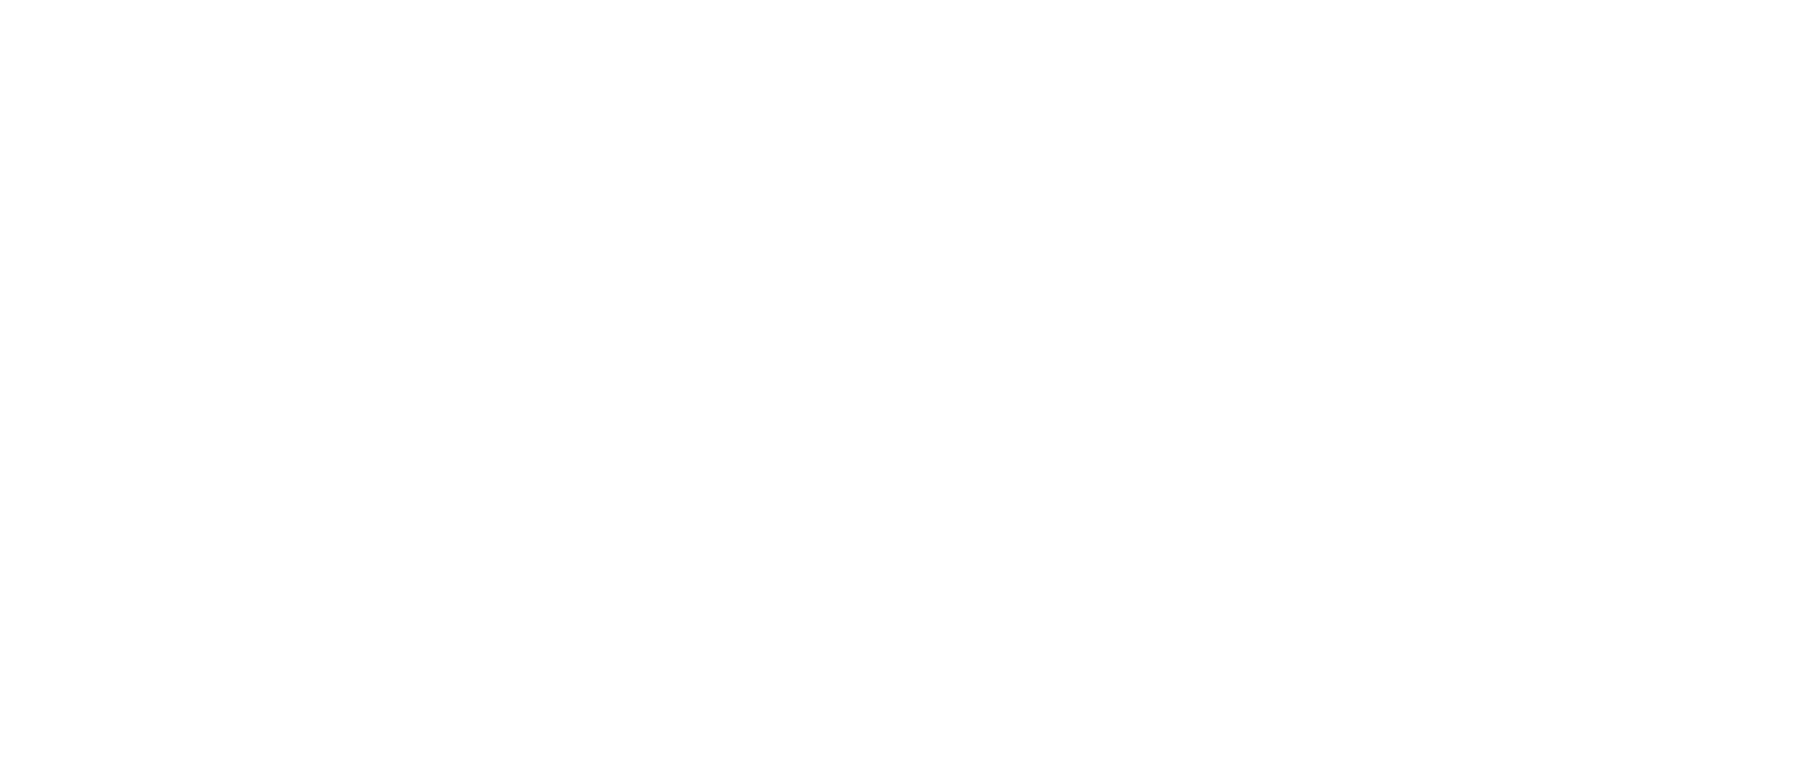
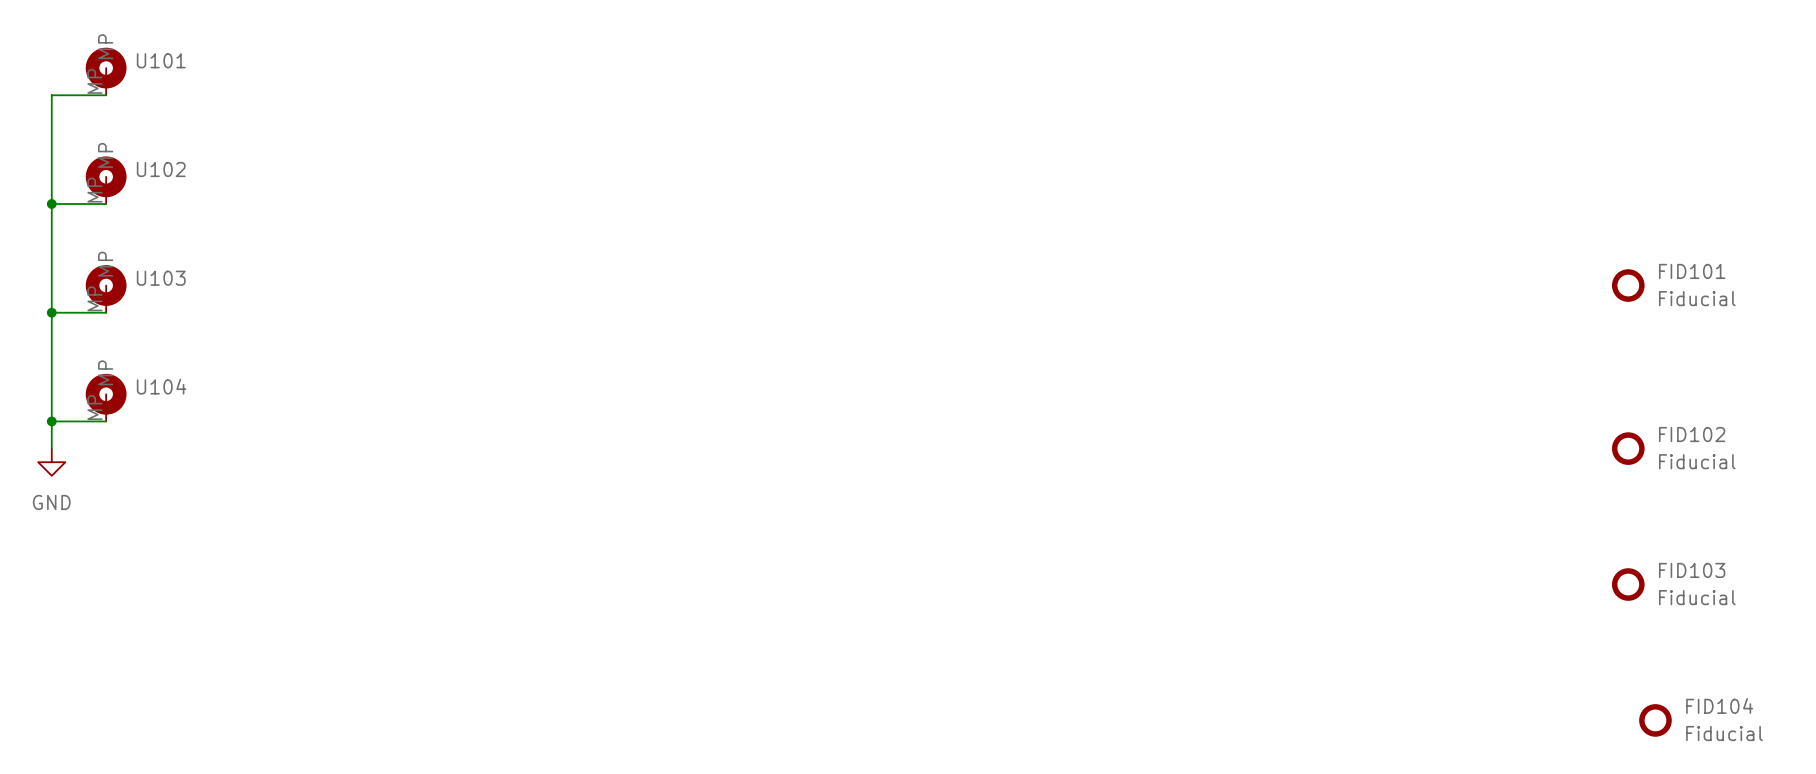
U101: none -> (106, 71)
wire: none -> (106, 95) (51, 95) (51, 448)
U102: none -> (106, 180)
wire: none -> (51, 203) (106, 203)
junction: none -> (51, 203)
FID101: none -> Fiducial (1628, 285)
U103: none -> (106, 288)
wire: none -> (51, 312) (106, 312)
junction: none -> (51, 312)
U104: none -> (106, 397)
wire: none -> (51, 421) (106, 421)
junction: none -> (51, 421)
FID102: none -> Fiducial (1628, 448)
power symbol: none -> GND (51, 462)
FID103: none -> Fiducial (1628, 584)
FID104: none -> Fiducial (1655, 720)

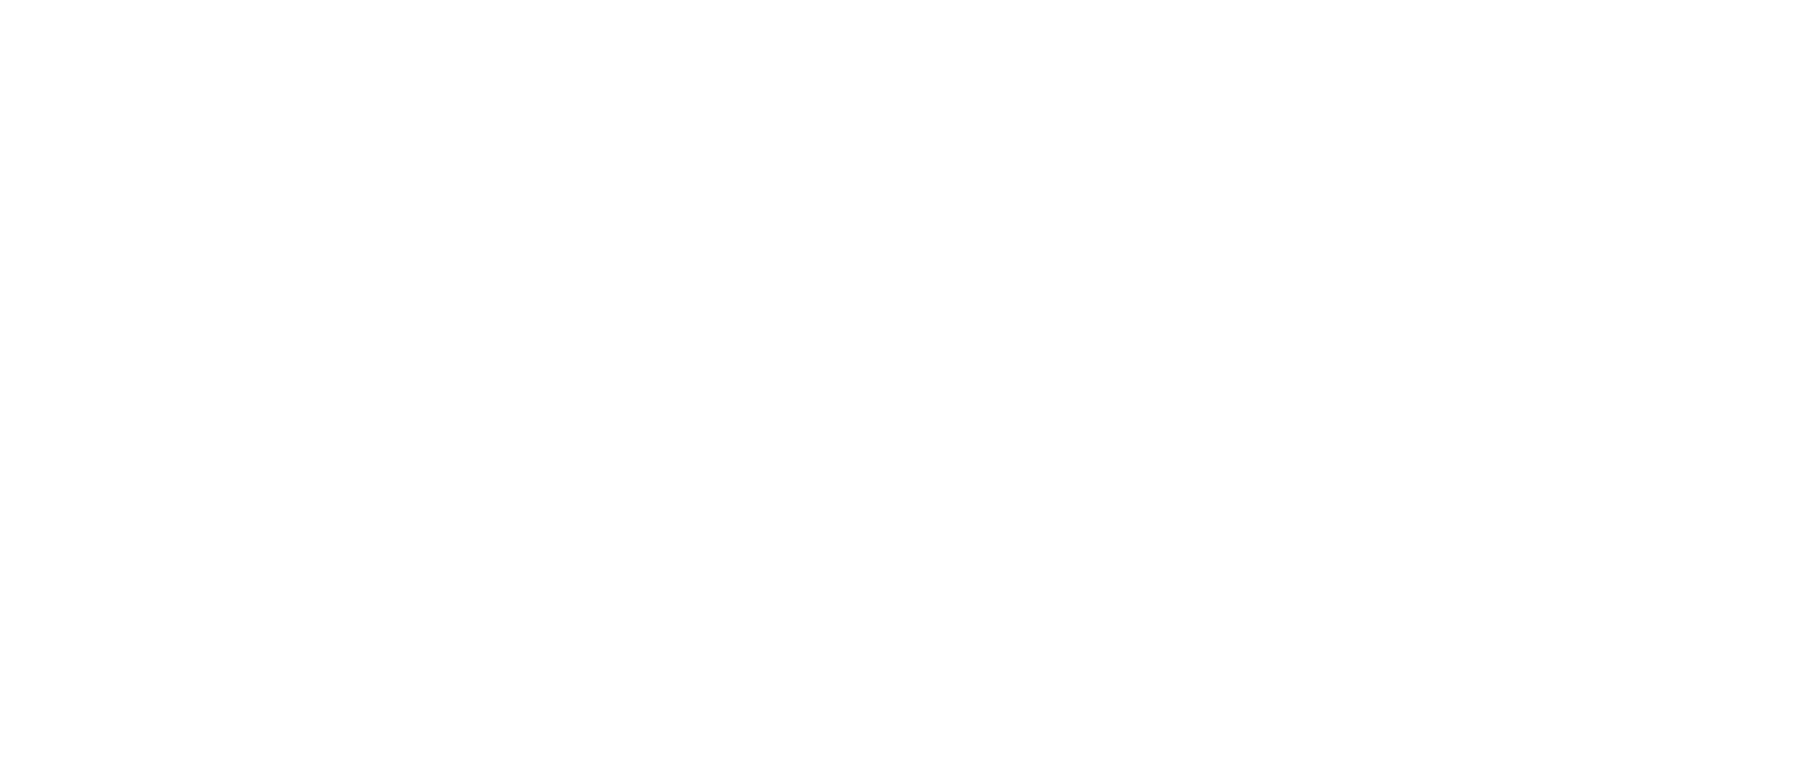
U101: (106, 71) -> none
wire: (106, 95) (51, 95) (51, 448) -> none
U102: (106, 180) -> none
wire: (51, 203) (106, 203) -> none
junction: (51, 203) -> none
FID101: Fiducial (1628, 285) -> none
U103: (106, 288) -> none
wire: (51, 312) (106, 312) -> none
junction: (51, 312) -> none
U104: (106, 397) -> none
wire: (51, 421) (106, 421) -> none
junction: (51, 421) -> none
FID102: Fiducial (1628, 448) -> none
power symbol: GND (51, 462) -> none
FID103: Fiducial (1628, 584) -> none
FID104: Fiducial (1655, 720) -> none

